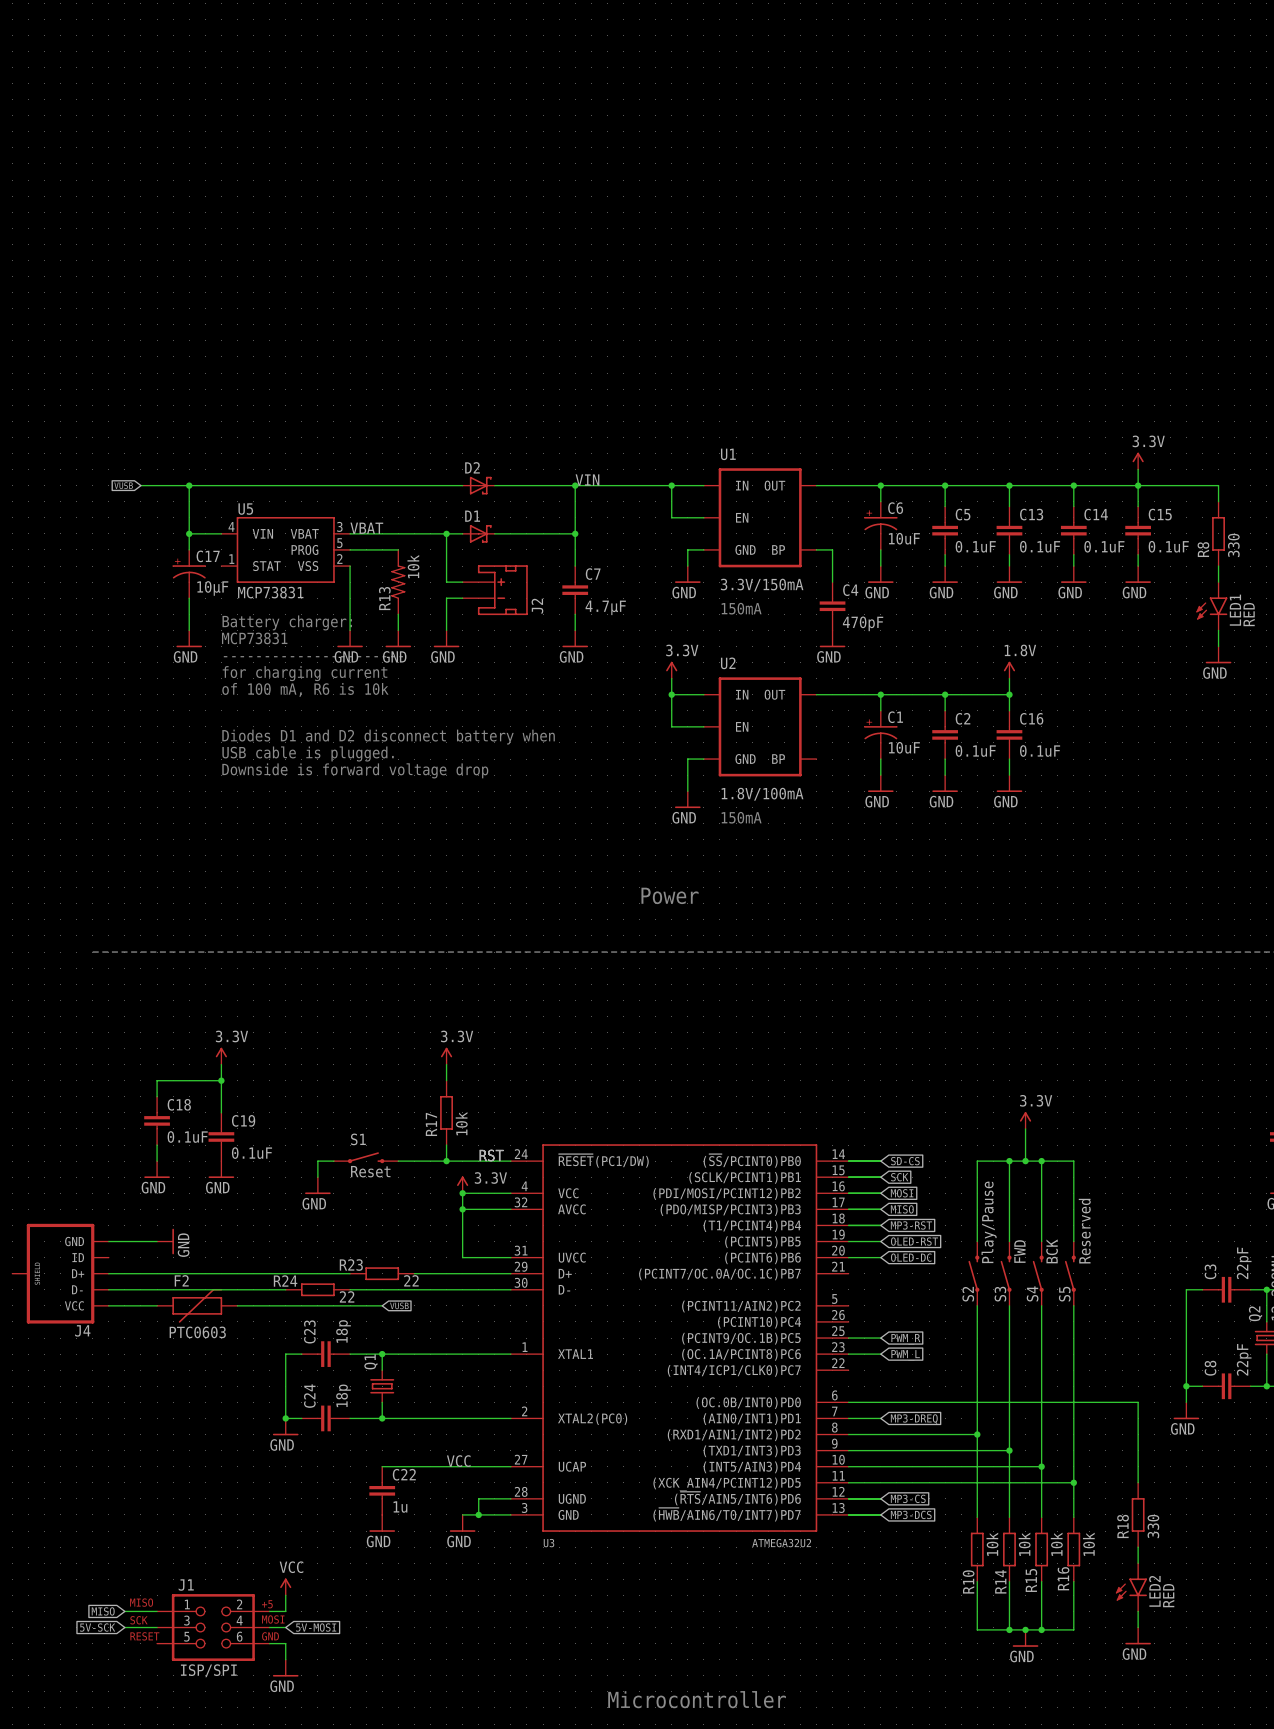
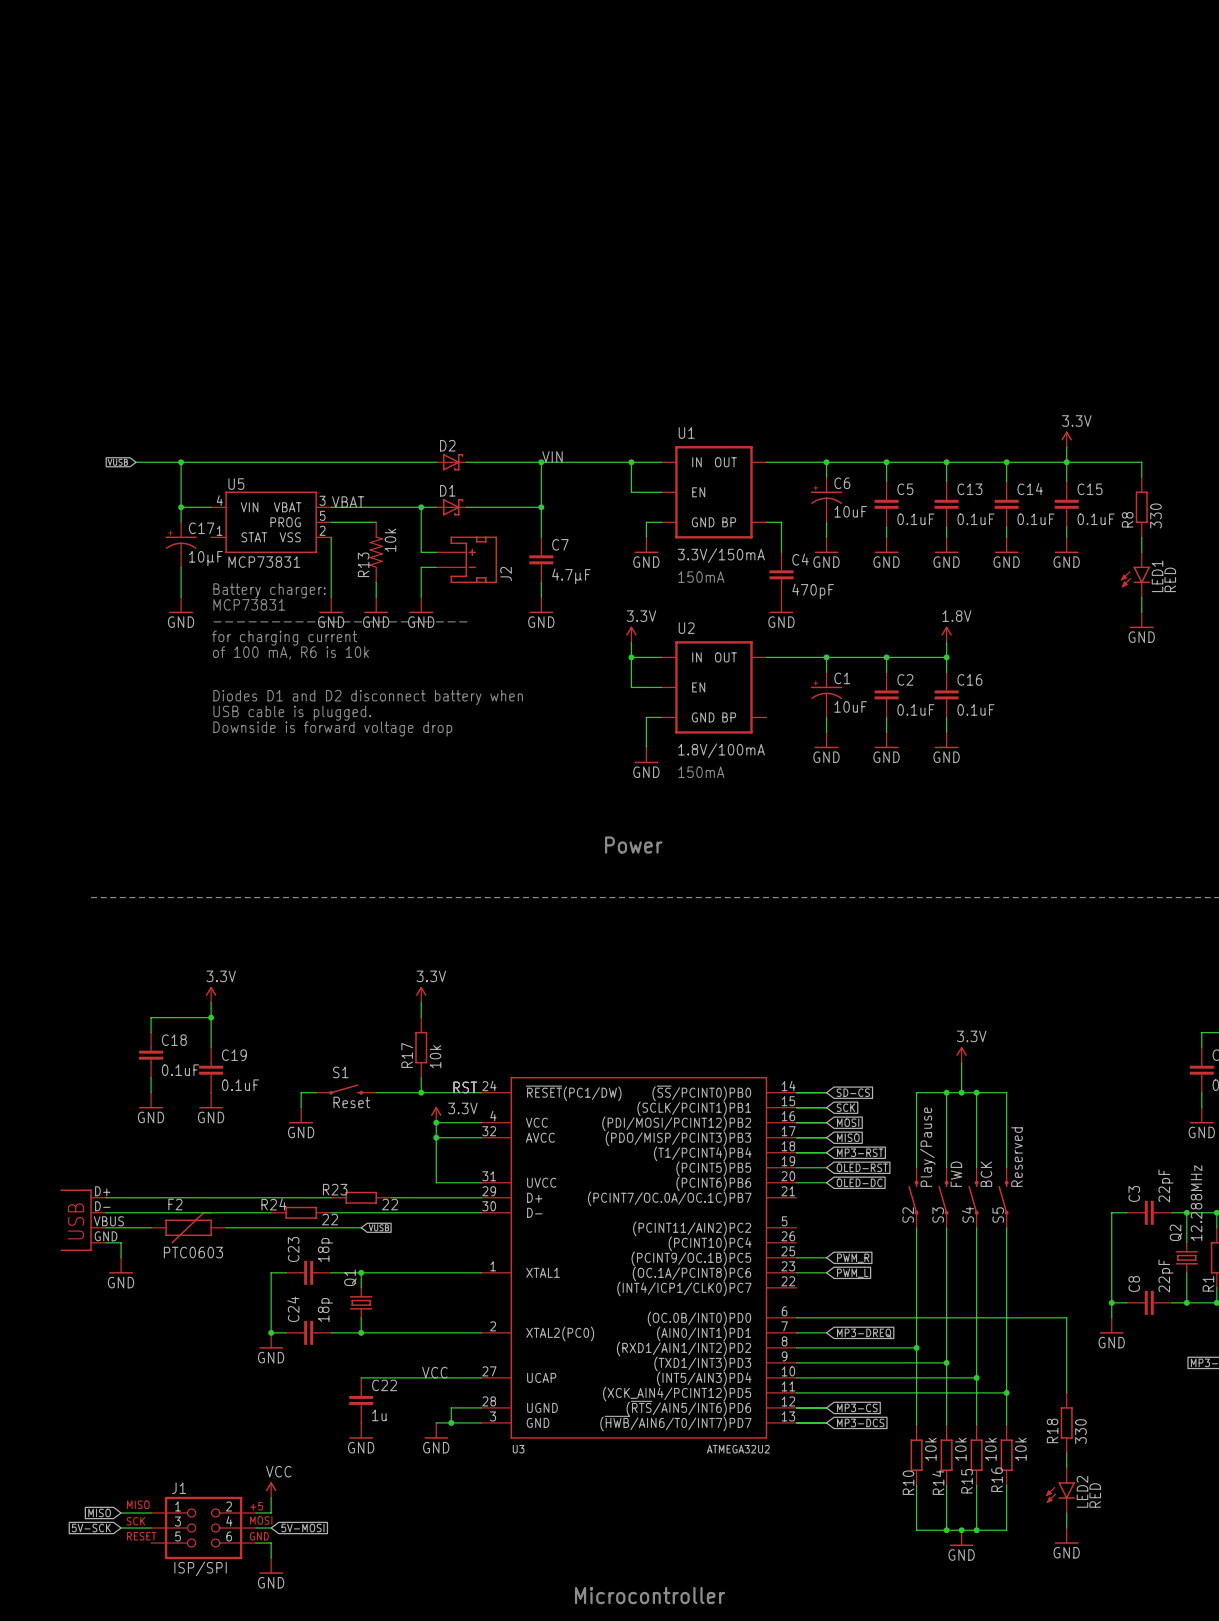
wire: (108, 1241) (157, 1241) -> none
power symbol position: GND (165, 1241) -> GND (121, 1265)
power symbol rotation: 0° (173, 1241) -> 90° clockwise (121, 1272)
J4: (60, 1273) -> none
part: none -> (83, 1220)
wire: none -> (106, 1242) (121, 1242) (121, 1257)

